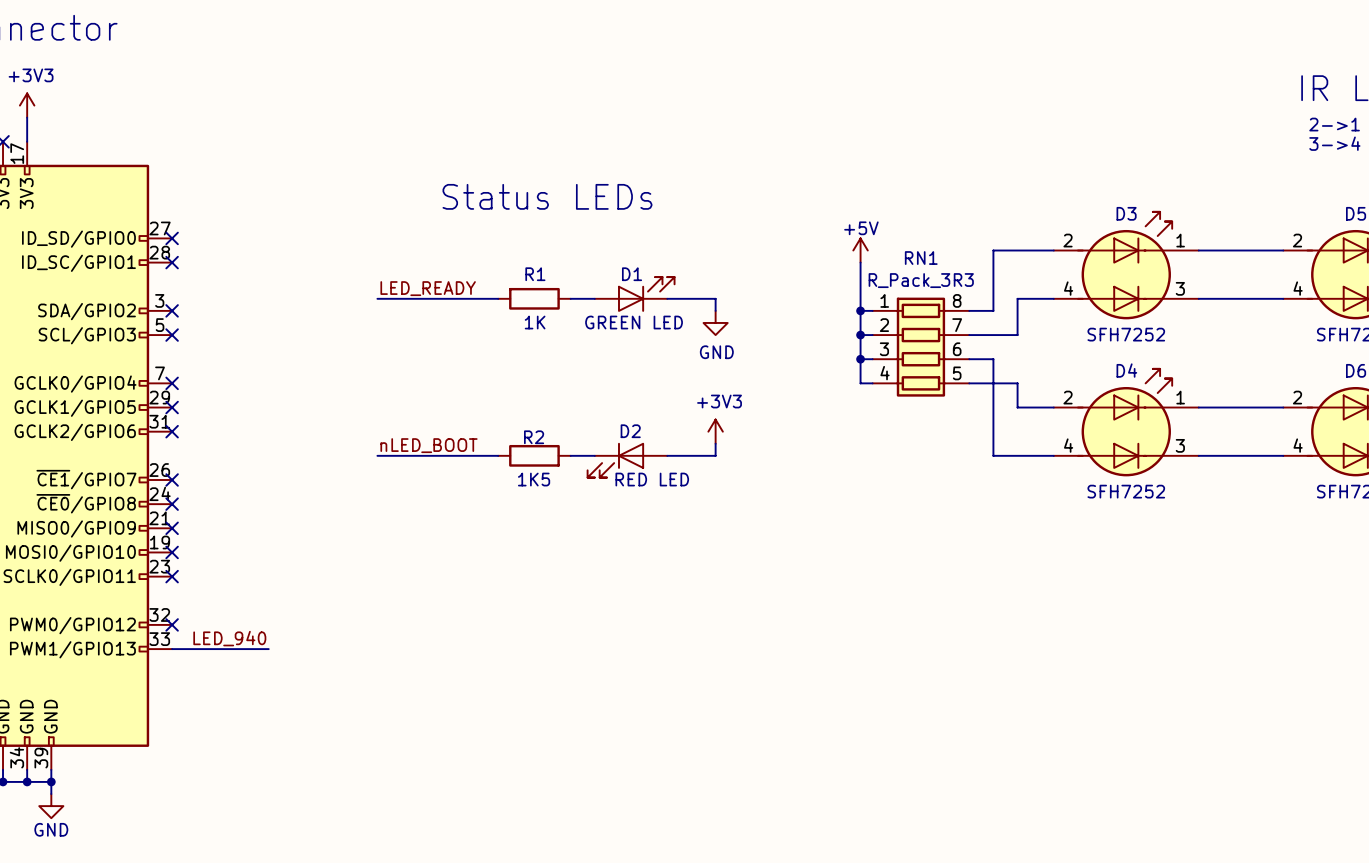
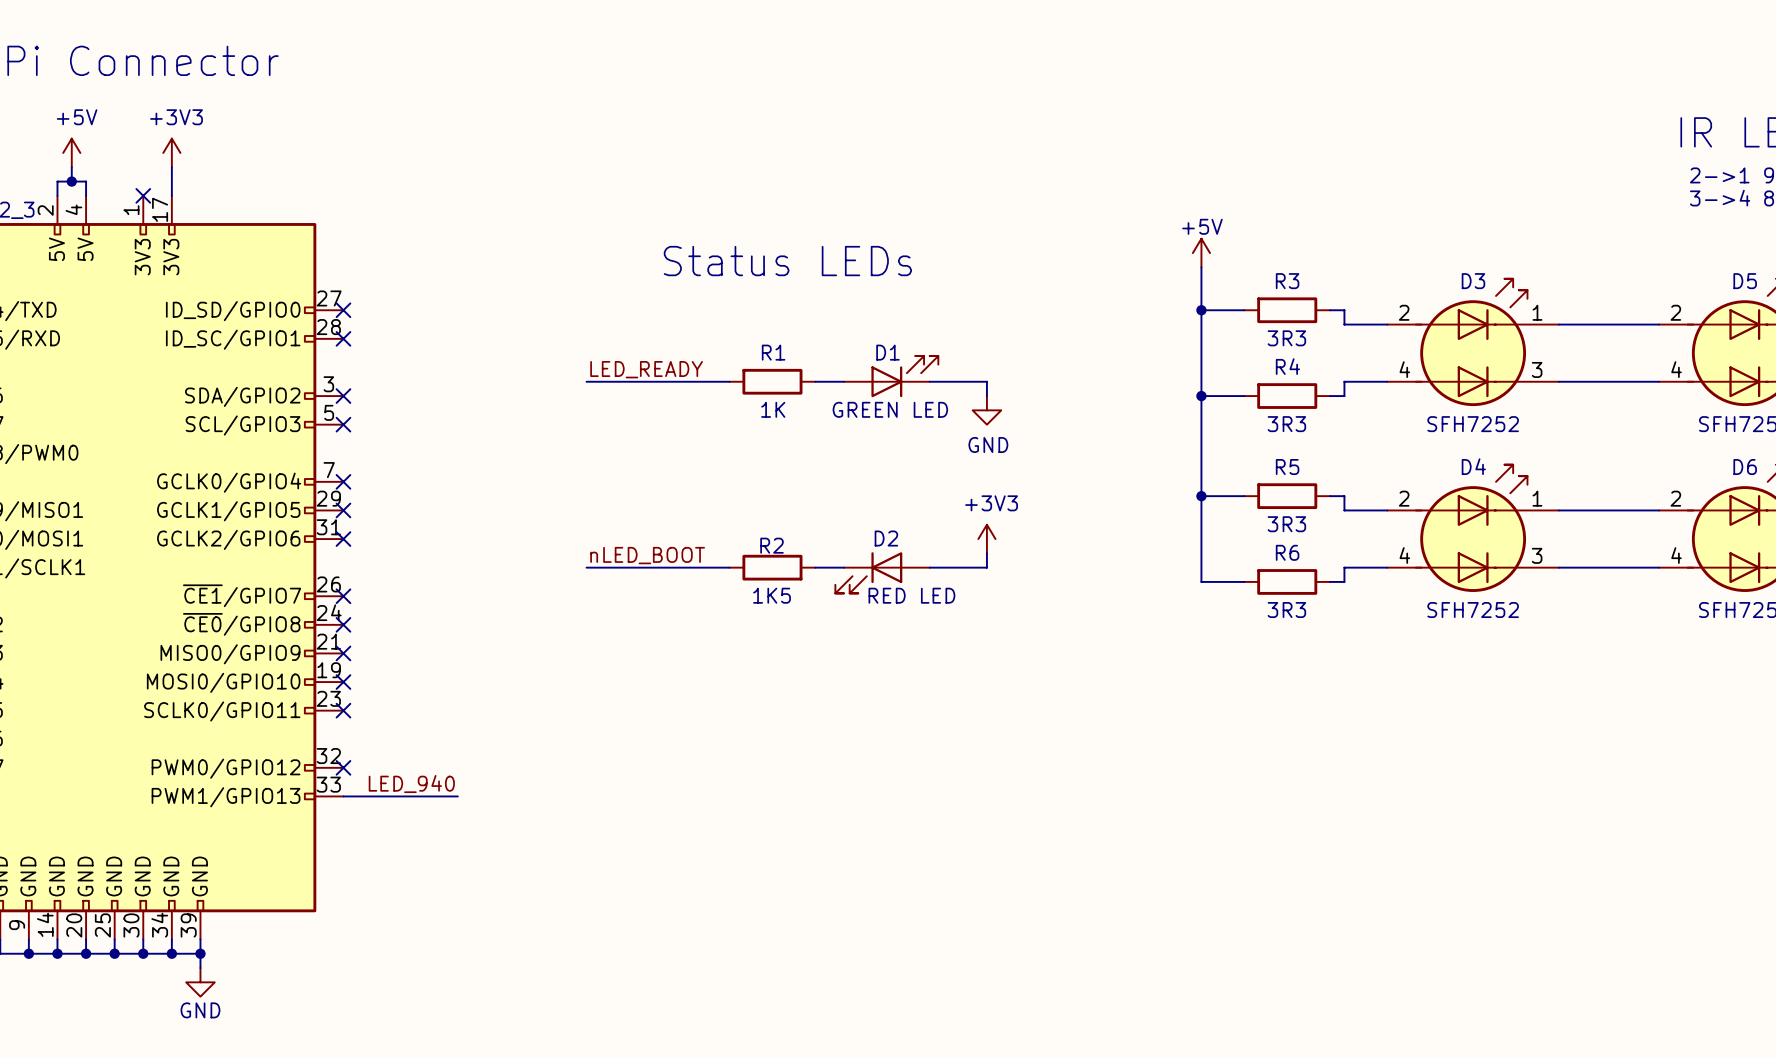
wire: none -> (1201, 267) (1201, 581) (1244, 581)
wire: none -> (1201, 310) (1244, 310)
junction: none -> (1201, 310)
R3: none -> 3R3 (1287, 310)
power symbol position: +5V (860, 250) -> +5V (1201, 253)
wire: (1017, 250) (993, 250) (993, 310) (969, 310) -> (1344, 324) (1344, 310) (1330, 310)
wire: (860, 262) (860, 383) (872, 383) -> none
wire: (860, 310) (872, 310) -> none
junction: (860, 310) -> none
junction: none -> (1201, 396)
R4: none -> 3R3 (1287, 396)
wire: (1017, 310) (1017, 335) (969, 335) -> (1344, 396) (1330, 396)
wire: (860, 335) (872, 335) -> none
junction: (860, 335) -> none
RN1: R_Pack_3R3 (920, 347) -> none
wire: (860, 359) (872, 359) -> none
junction: (860, 359) -> none
wire: (969, 359) (993, 359) (993, 455) (1017, 455) -> (1330, 581) (1344, 581) (1344, 567)
wire: (969, 383) (1017, 383) (1017, 395) -> (1330, 496) (1344, 496)
junction: none -> (1201, 496)
R5: none -> 3R3 (1287, 496)
R6: none -> 3R3 (1287, 581)

